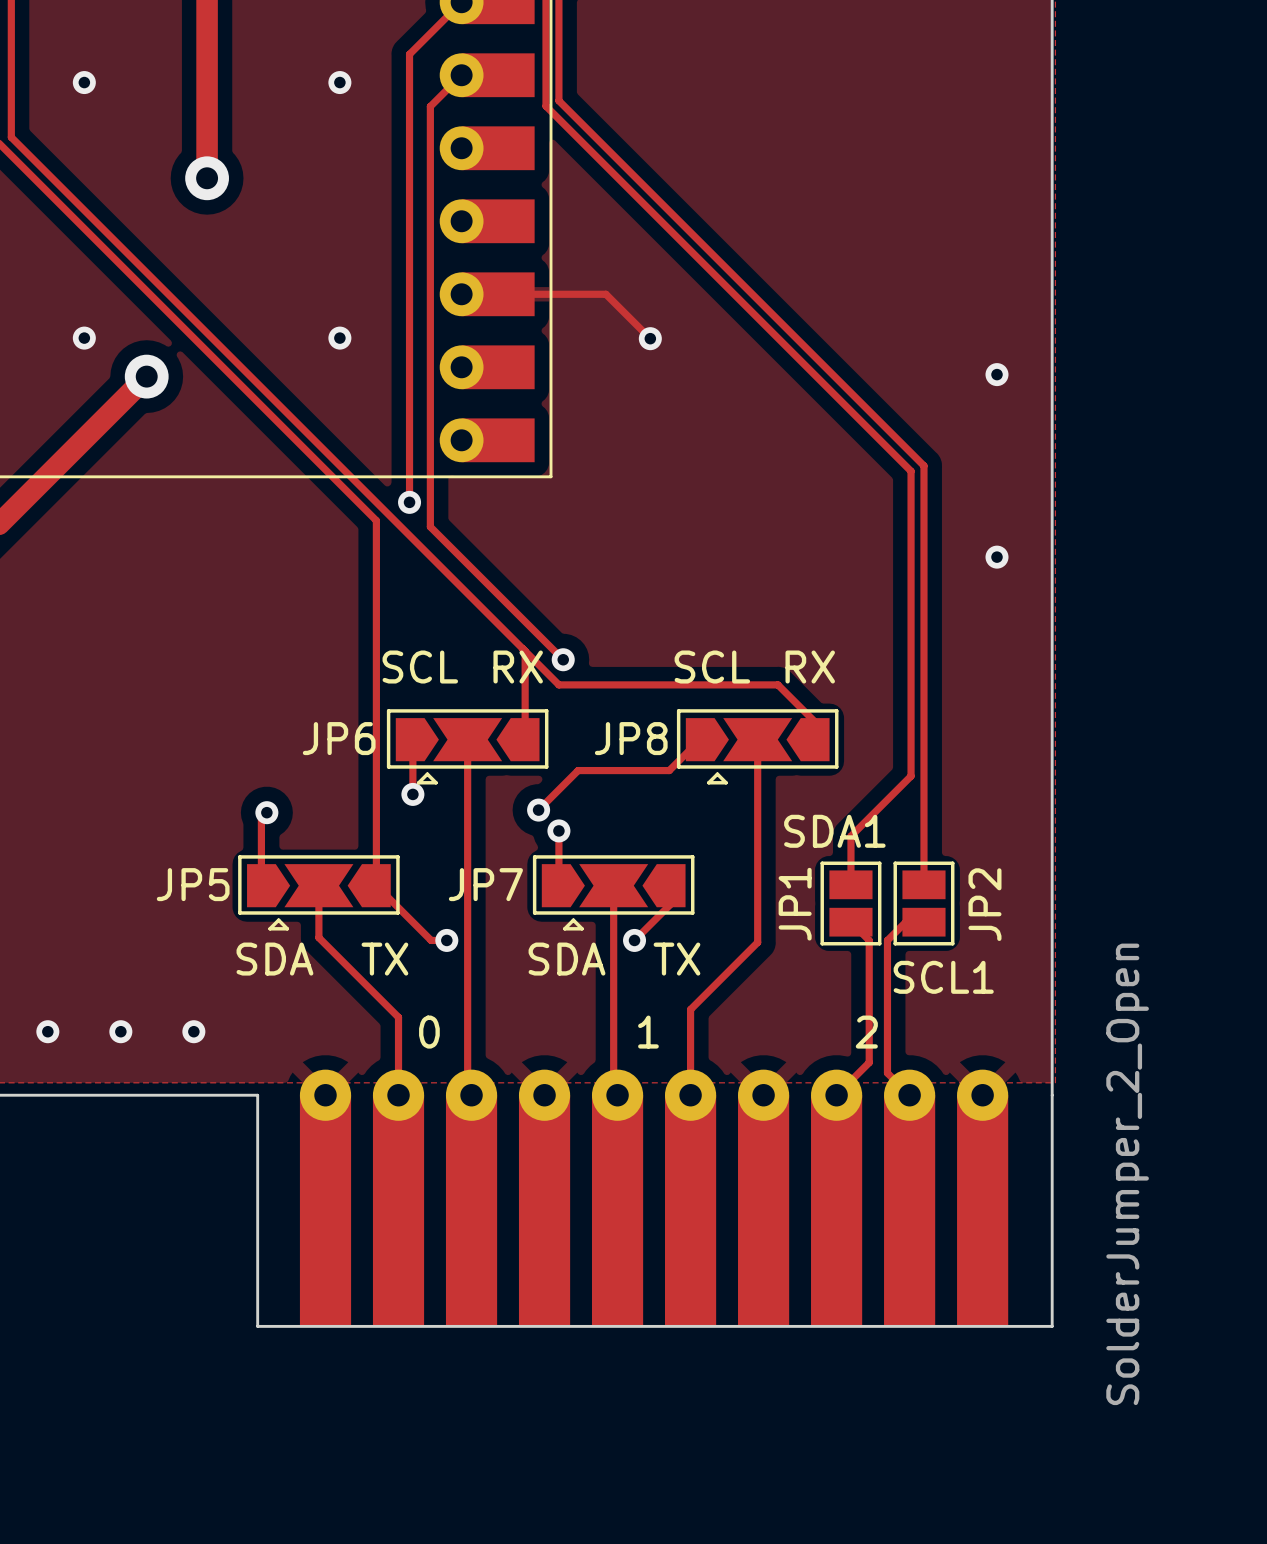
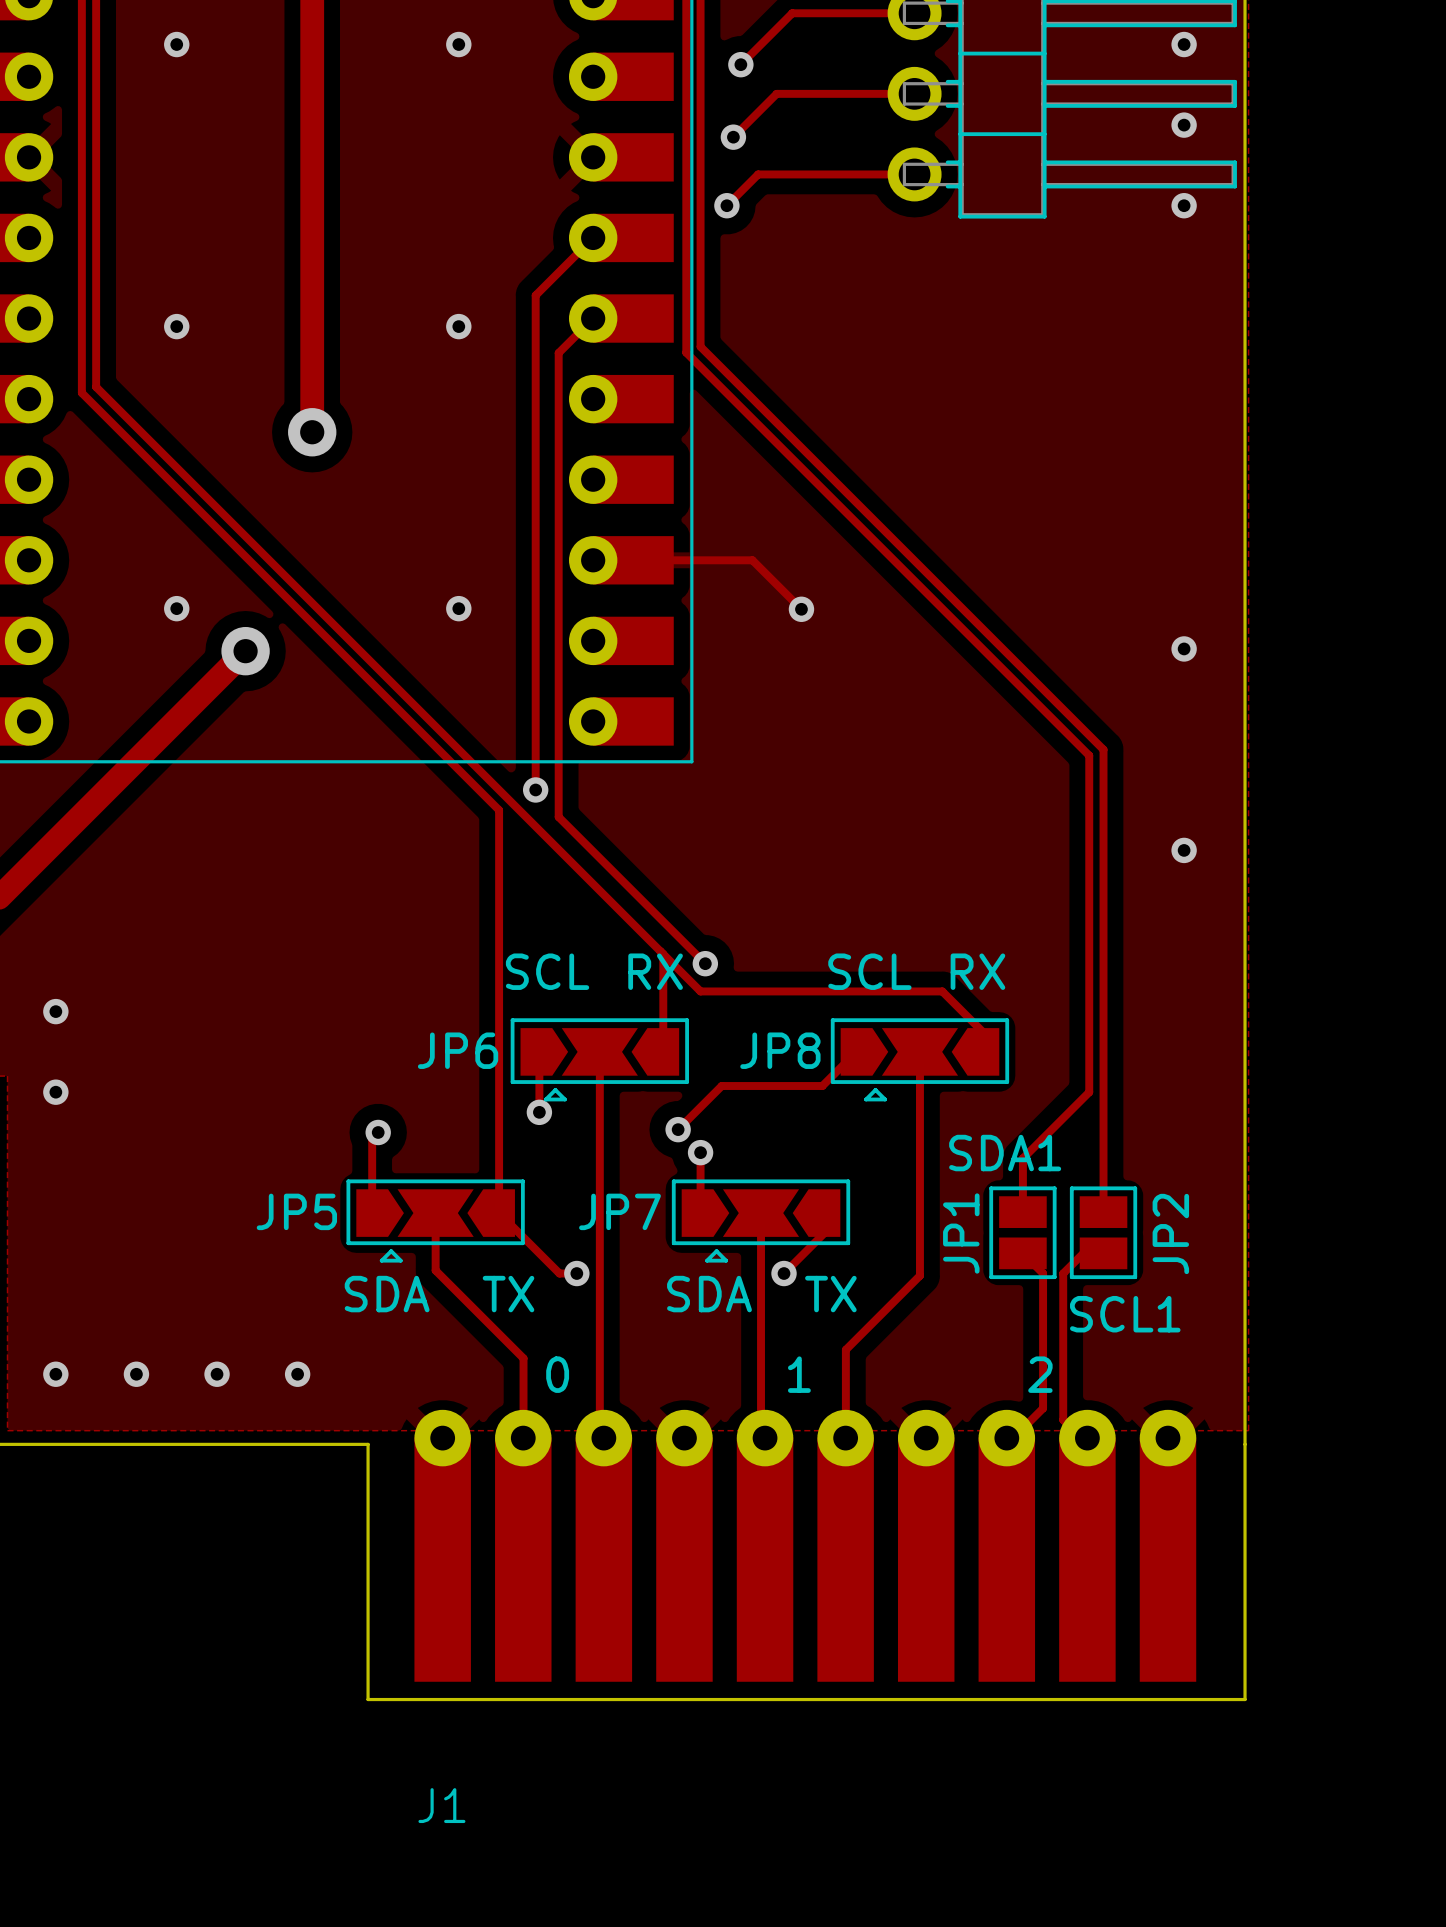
JP1 value: SolderJumper_2_Open (1127, 1174) -> none
J1: none -> (805, 1545)
part: (654, 1197) -> none

